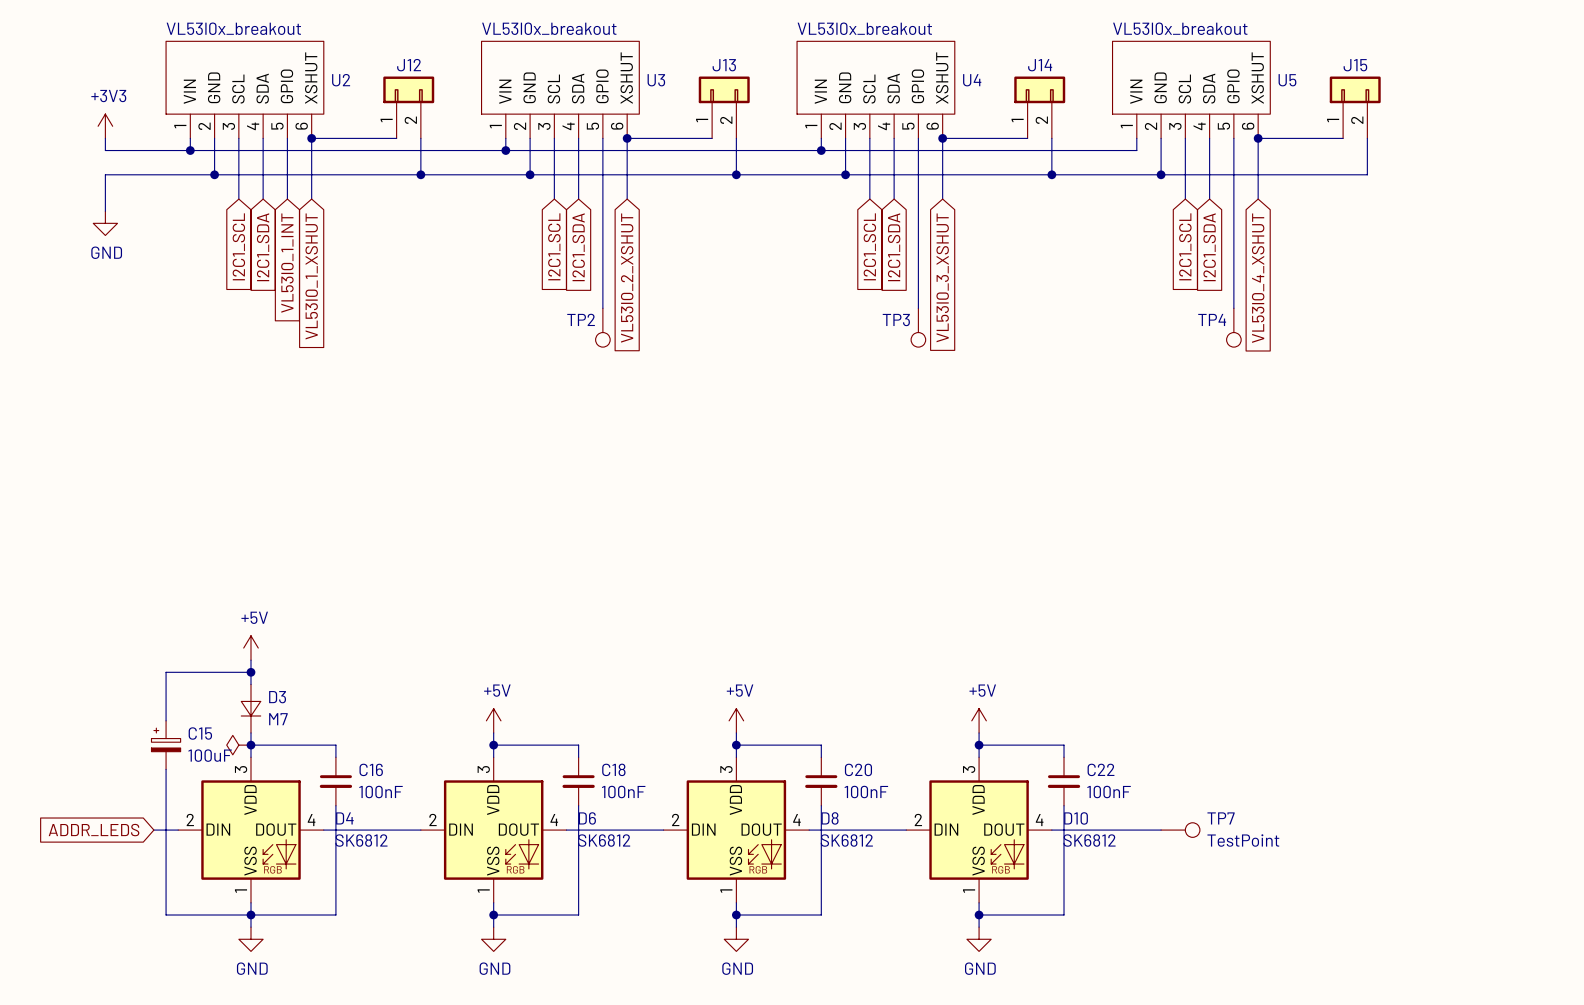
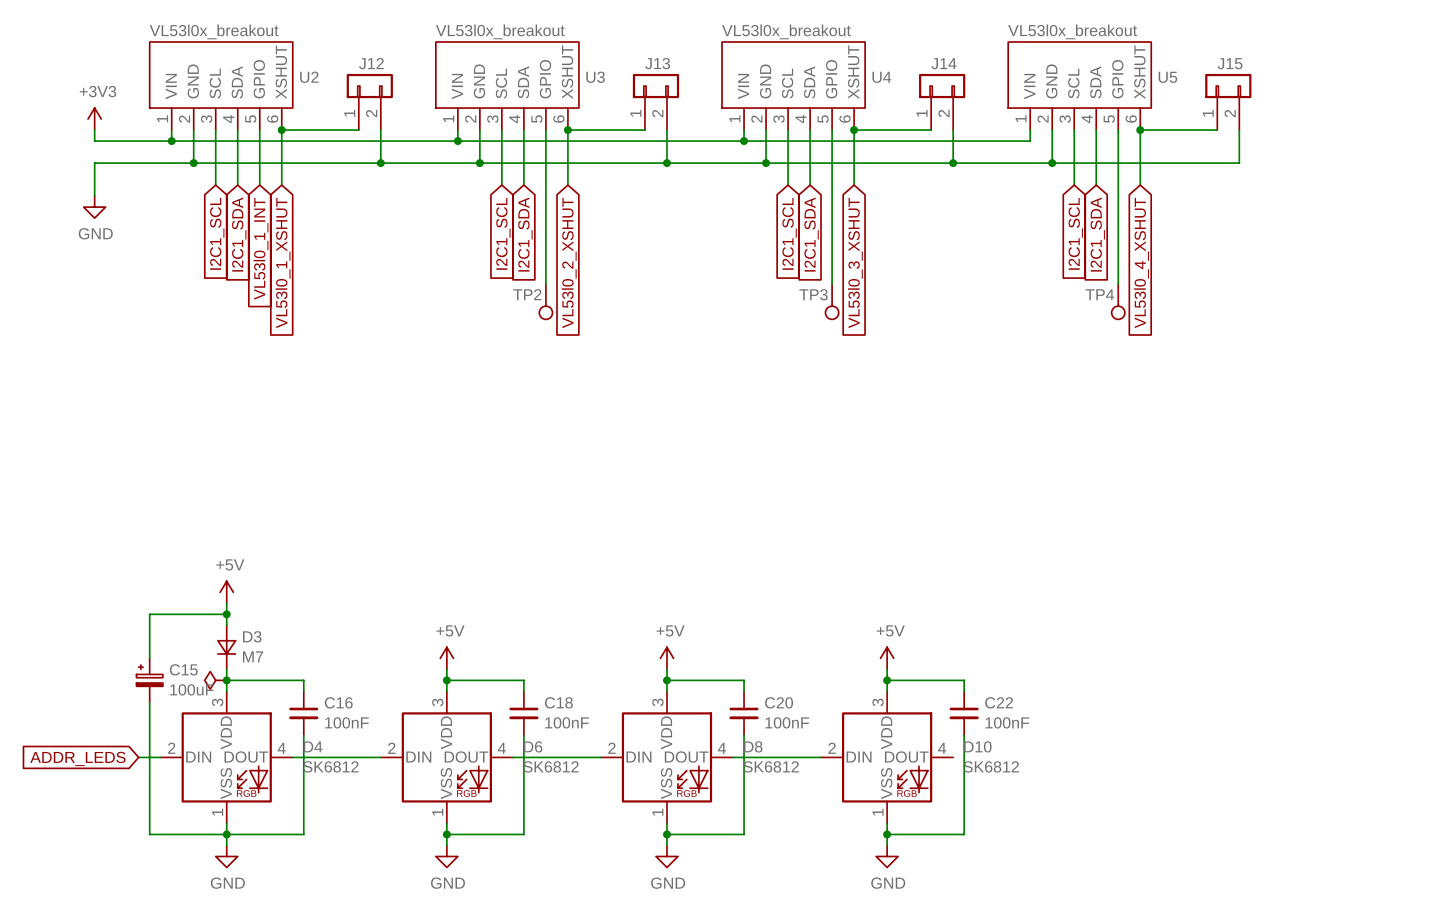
wire: (1051, 830) (1161, 830) -> none
TP7: TestPoint (1180, 830) -> none

